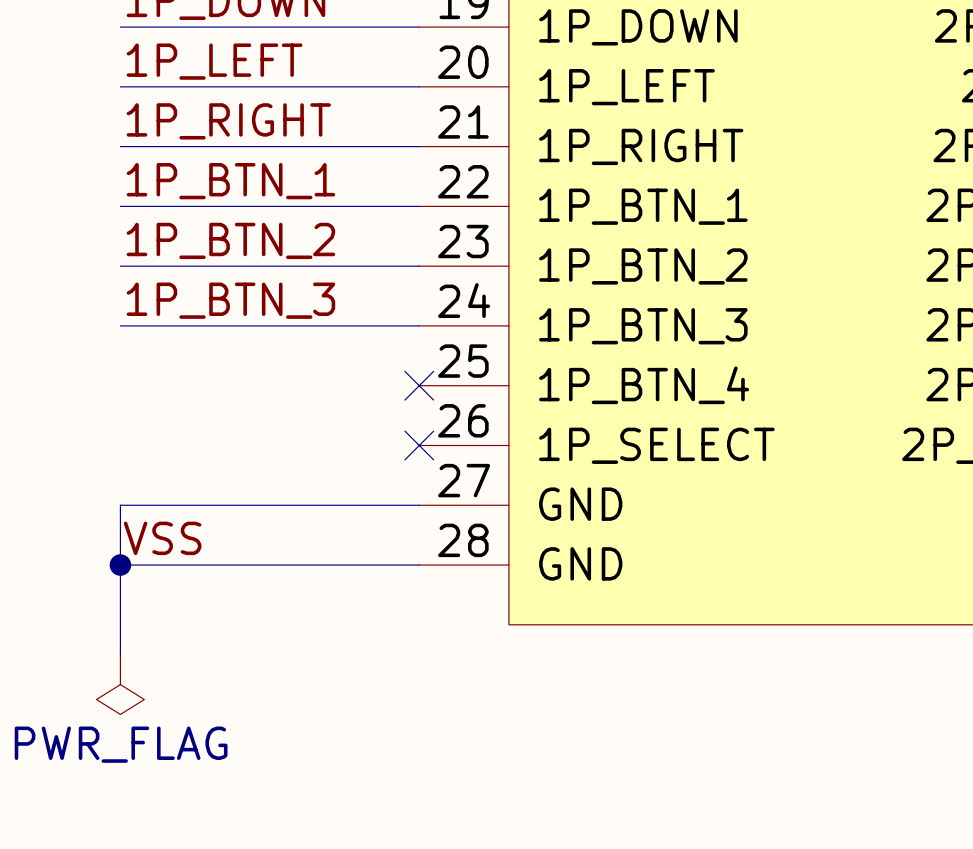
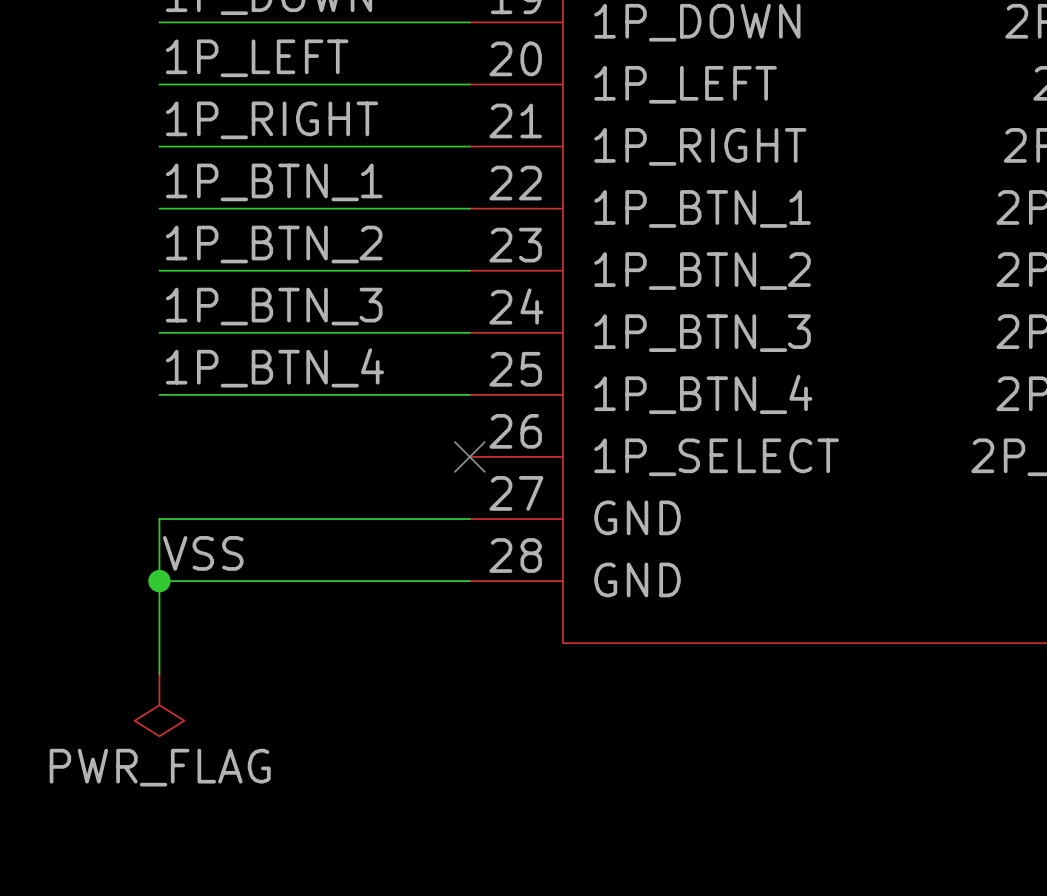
label: none -> 1P_BTN_4 (274, 367)
wire: none -> (159, 394) (469, 394)
no-connect mark: (419, 385) -> none

